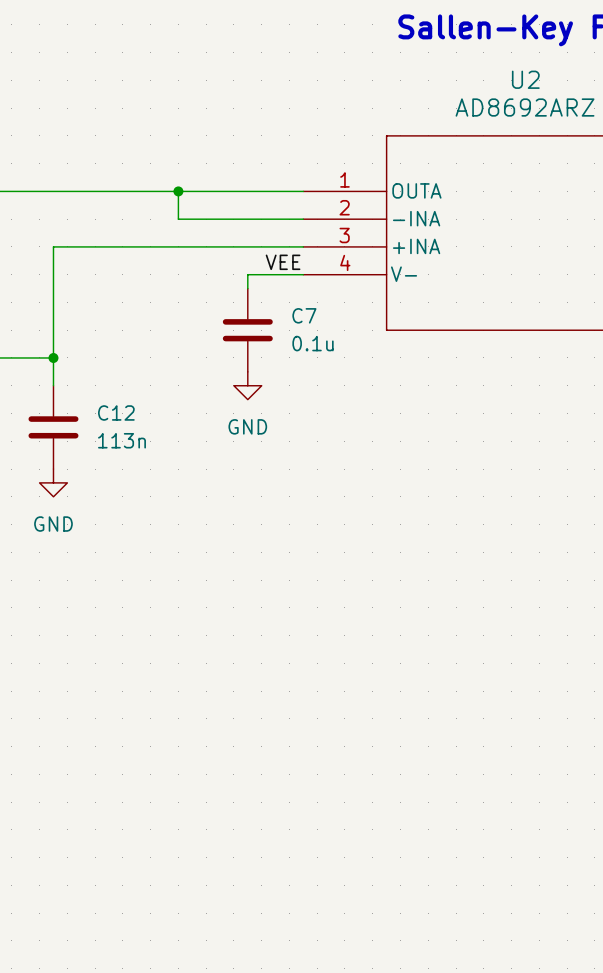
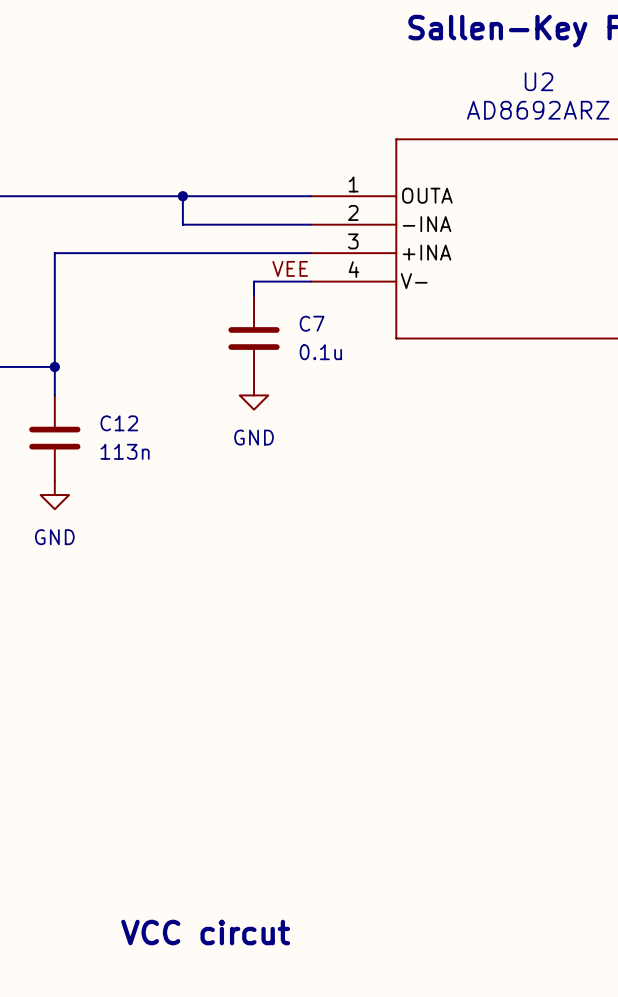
text: none -> VCC circut (205, 932)

